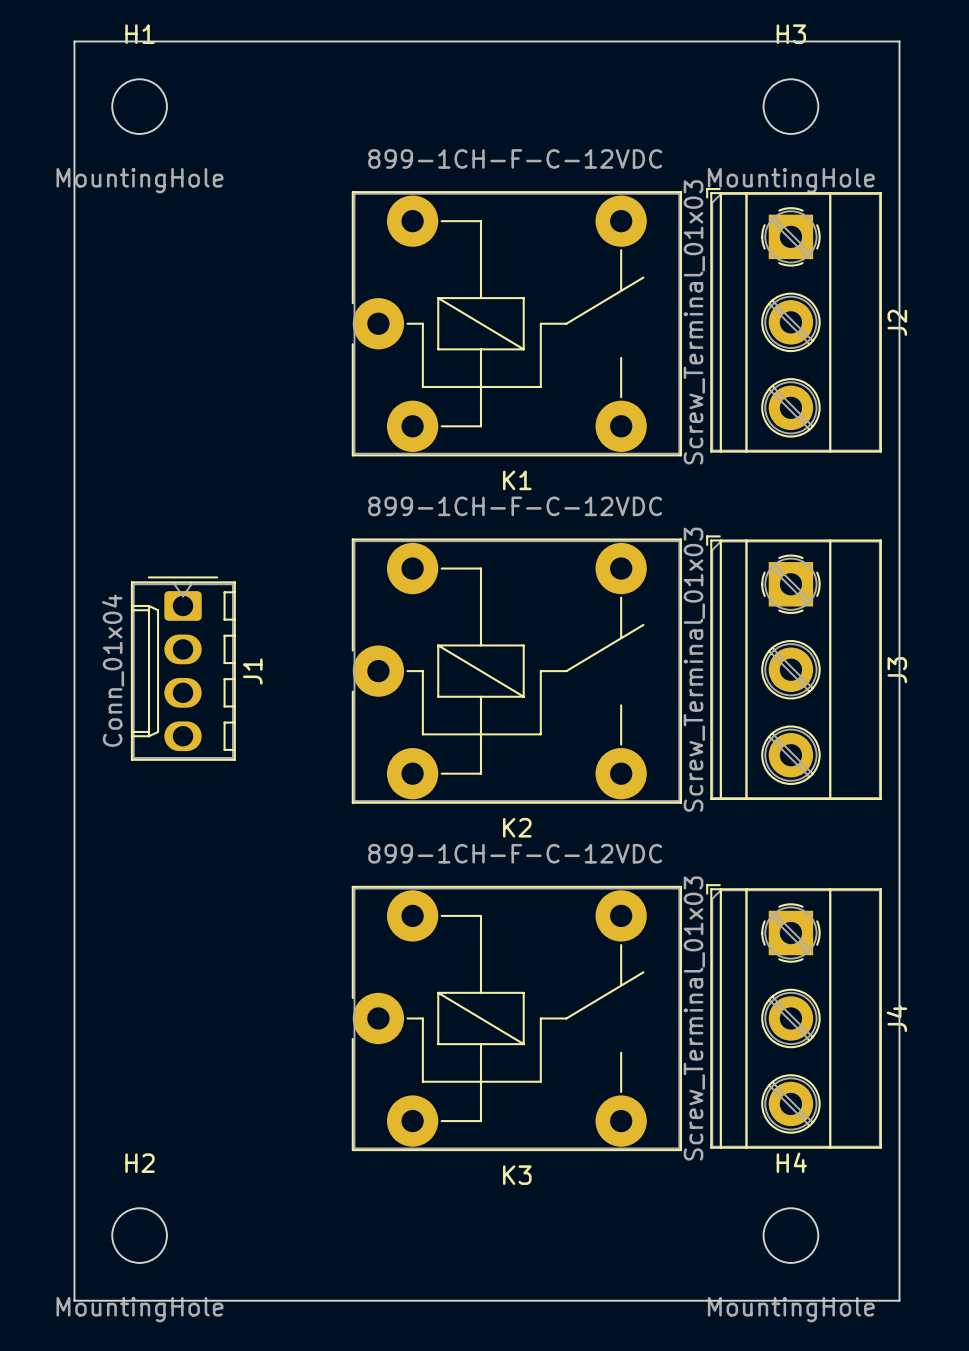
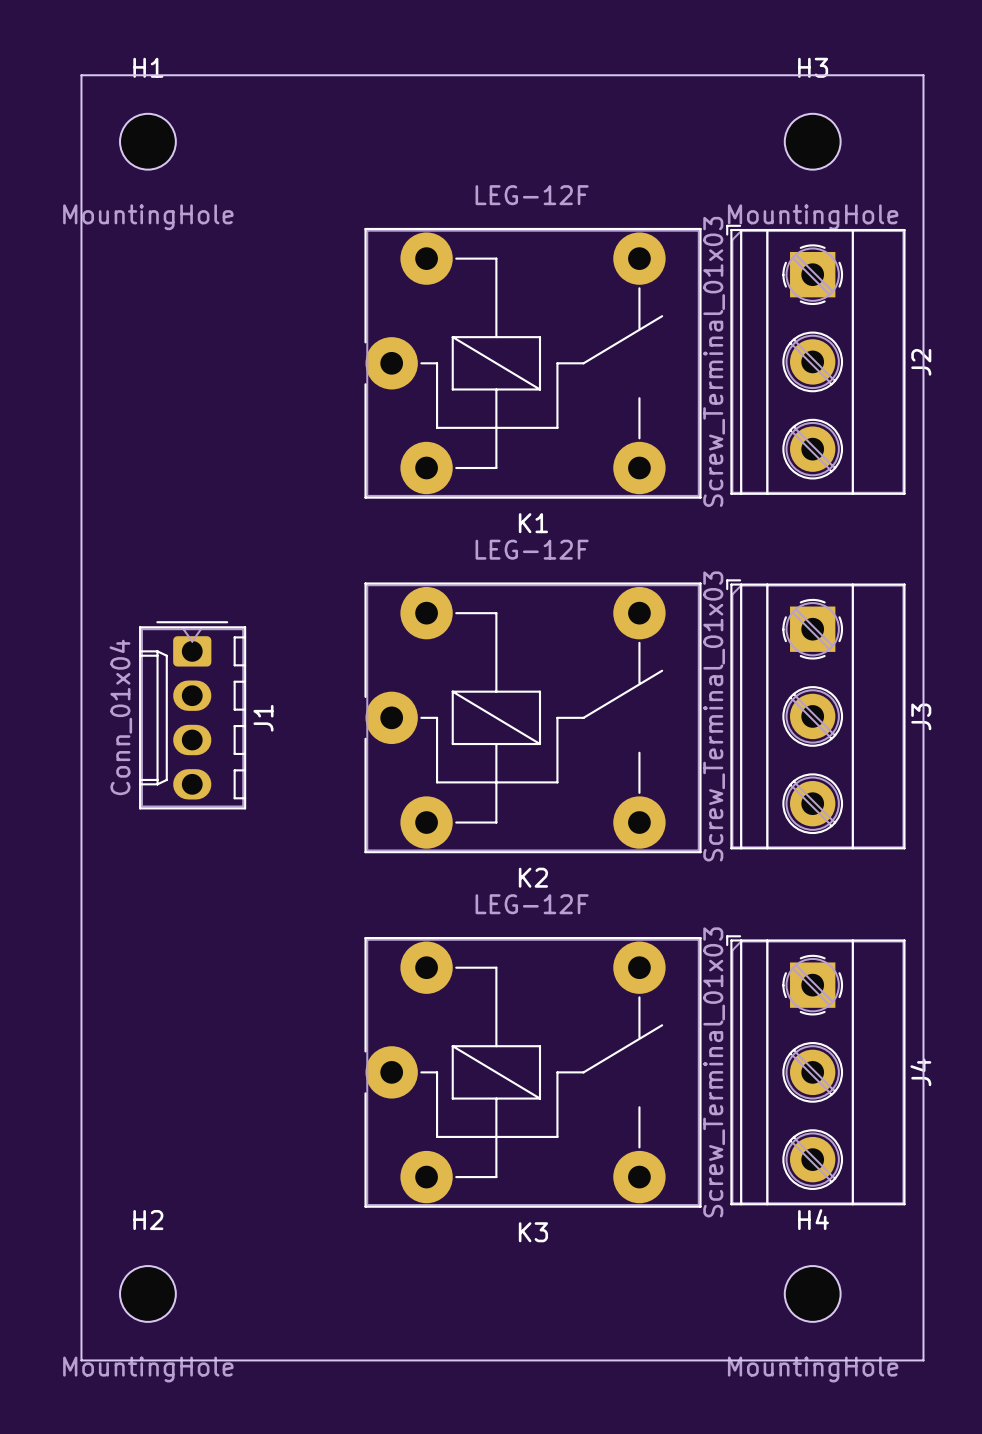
K1 value: 899-1CH-F-C-12VDC (515, 158) -> LEG-12F (532, 195)
K2 value: 899-1CH-F-C-12VDC (515, 506) -> LEG-12F (532, 549)
K3 value: 899-1CH-F-C-12VDC (515, 853) -> LEG-12F (532, 904)

